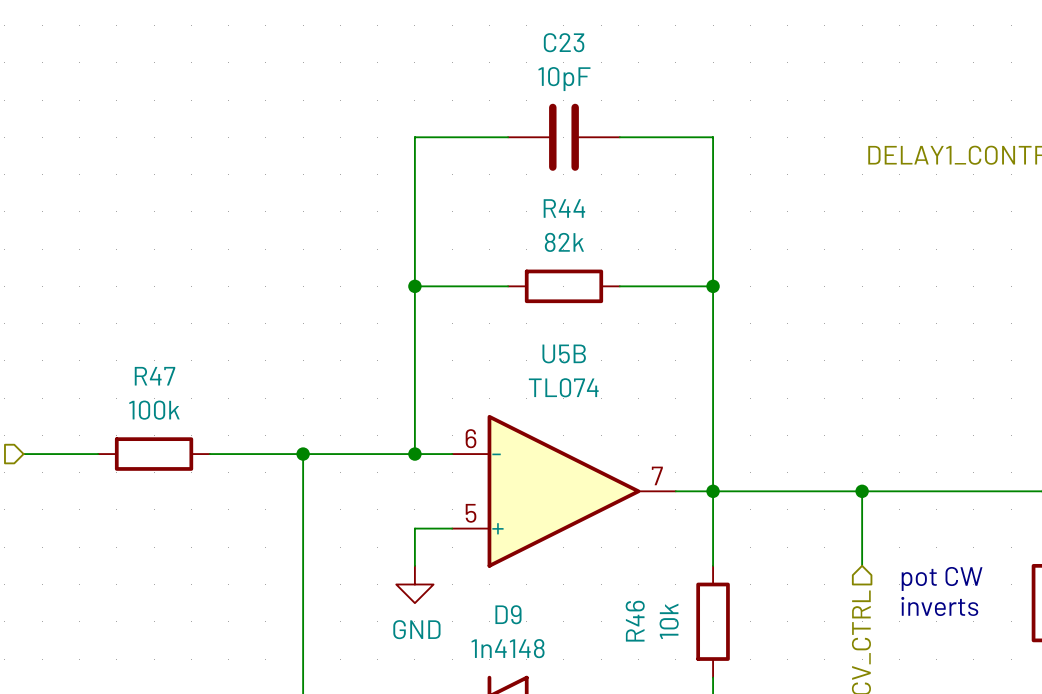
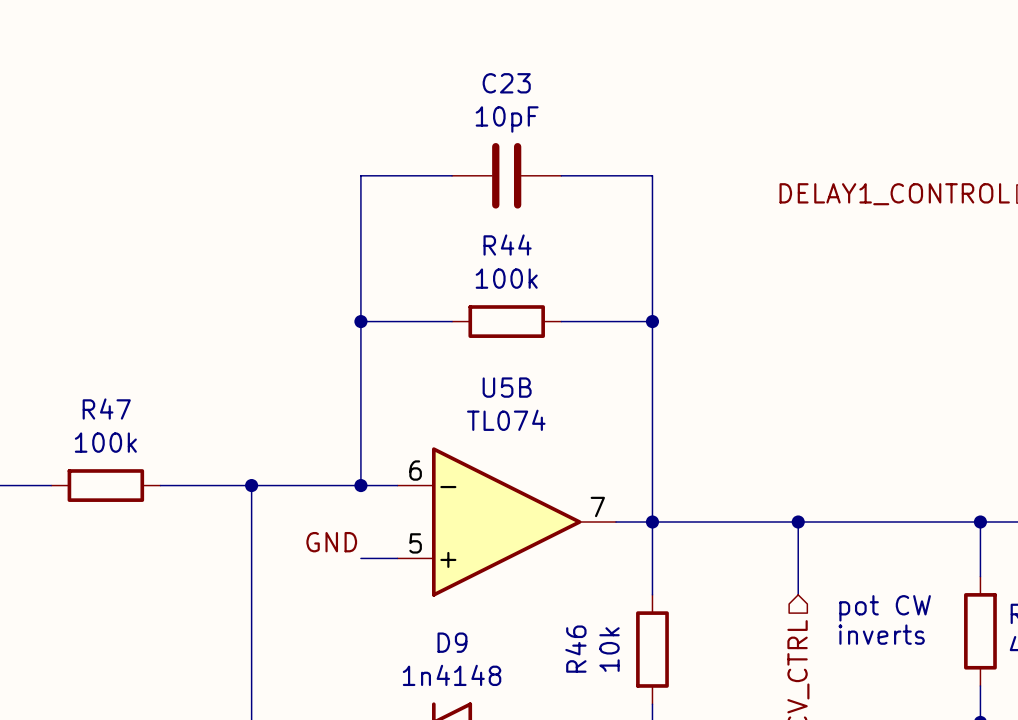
R44 value: 82k (564, 242) -> 100k (506, 278)
label: none -> GND (331, 542)
wire: (414, 528) (414, 565) -> none
power symbol: GND (414, 584) -> none

